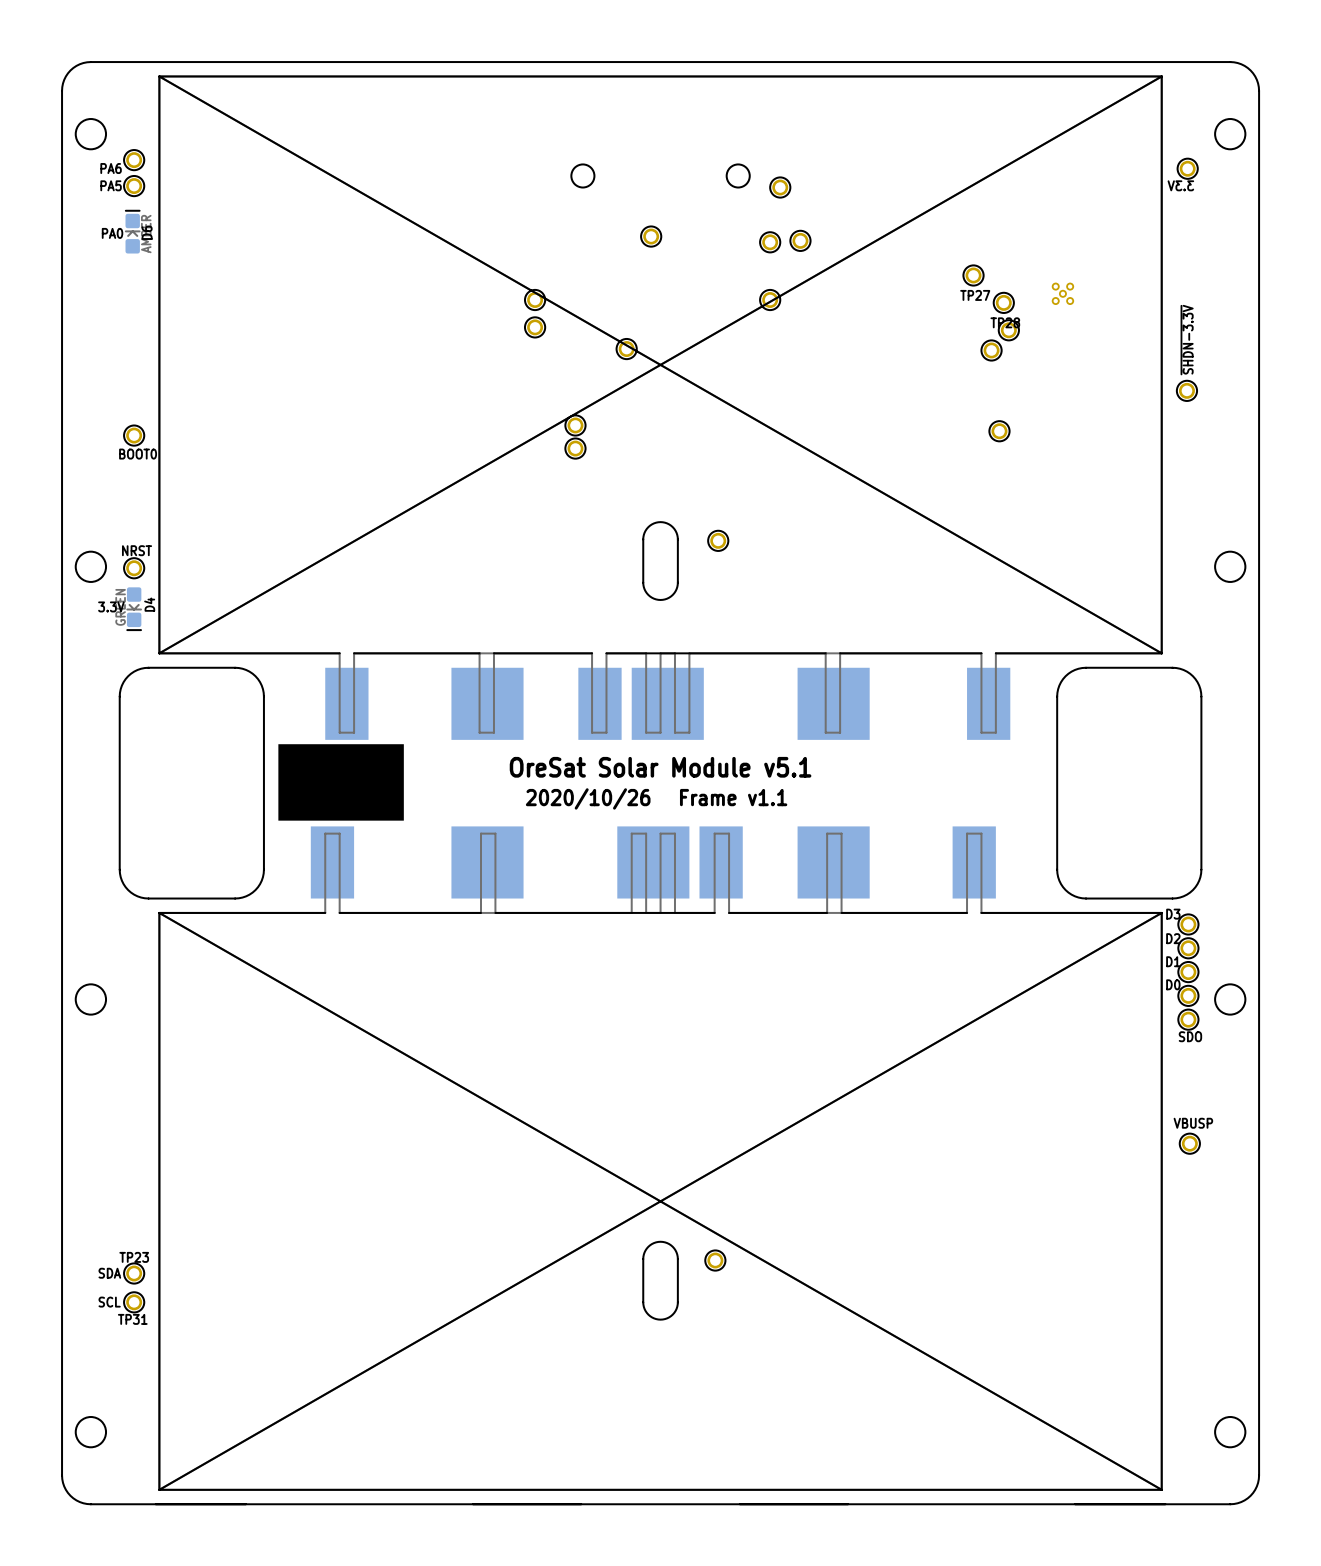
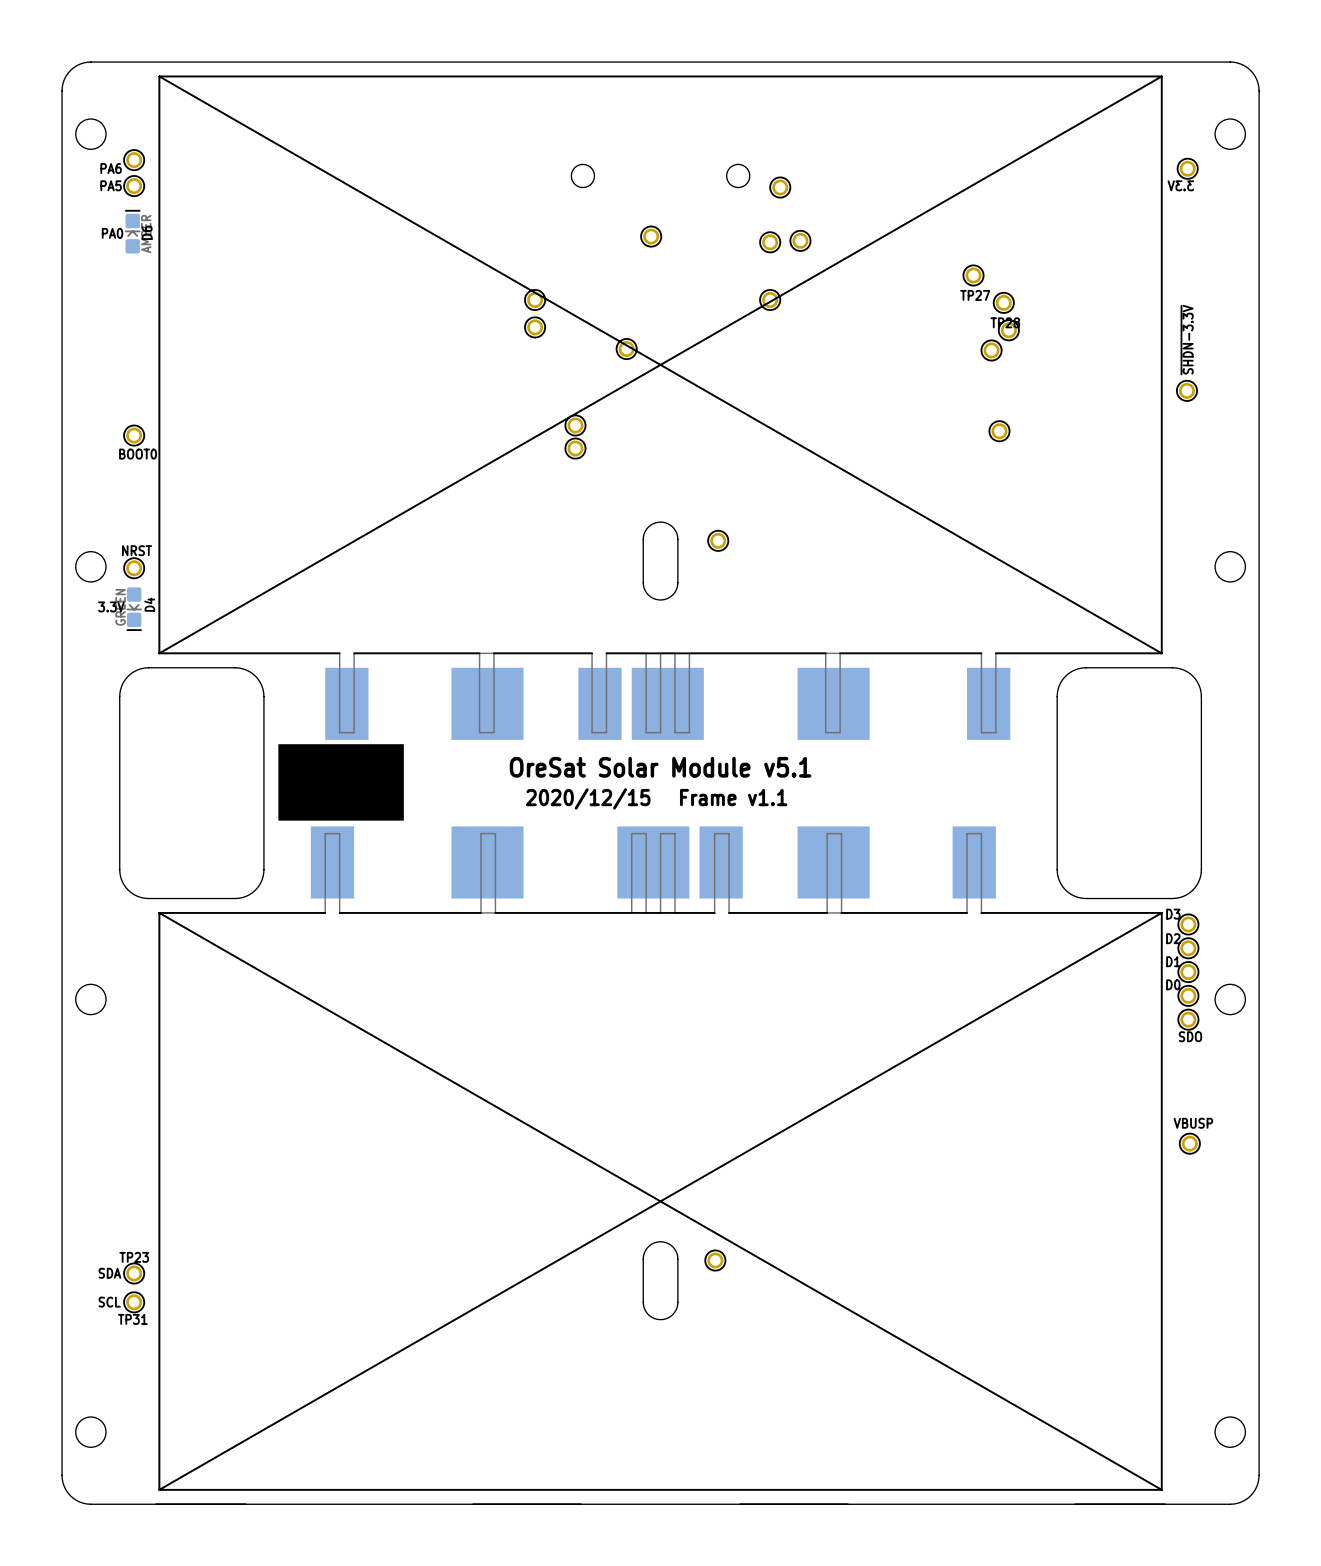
part: (1062, 293) -> none
text: 2020/10/26 (588, 798) -> 2020/12/15 (588, 798)

